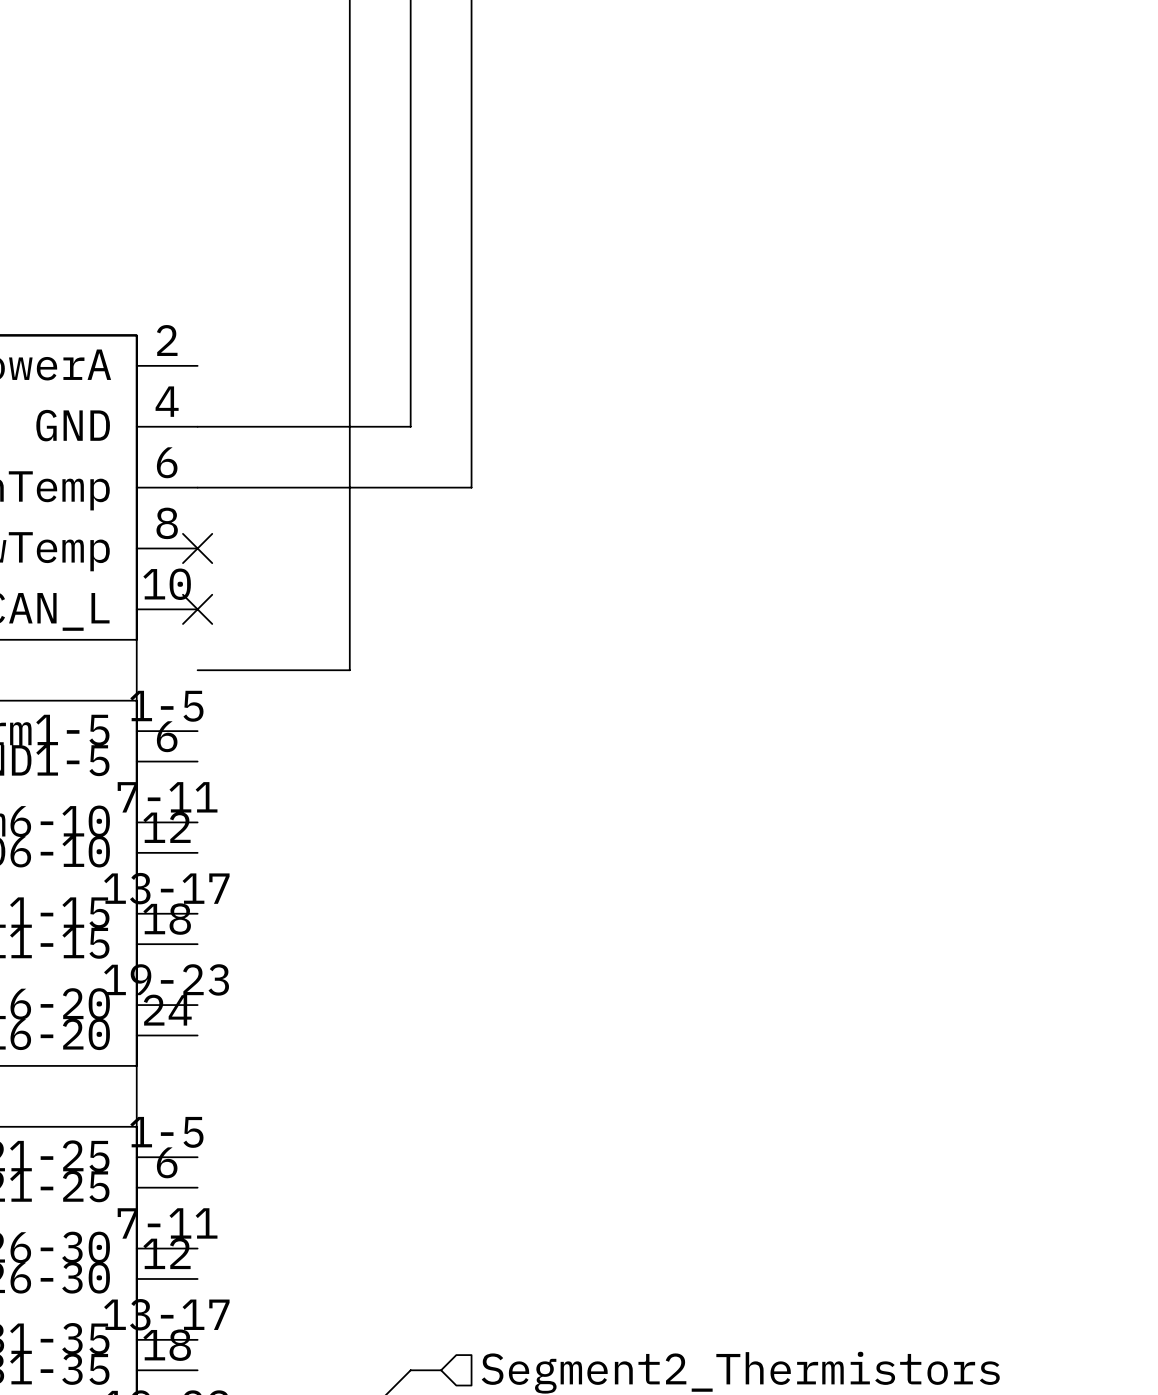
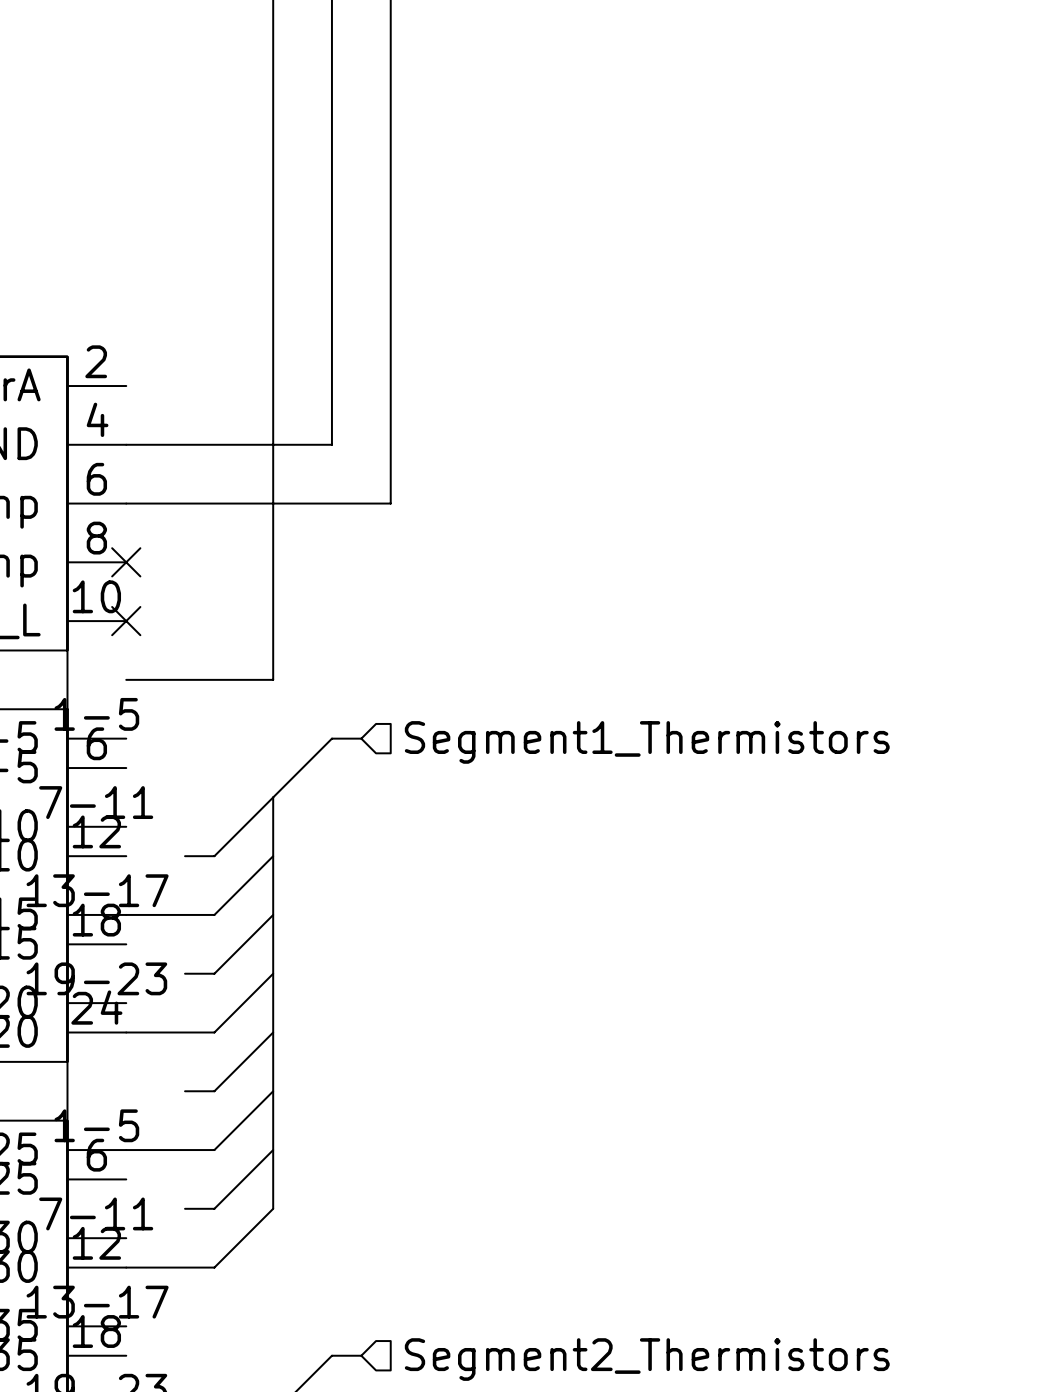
bus: none -> (361, 738) (331, 738) (273, 797) (273, 1208)
hierarchical label: none -> Segment1_Thermistors (647, 742)
wire: none -> (273, 797) (214, 856) (185, 856)
wire: none -> (273, 856) (214, 914) (126, 914)
wire: none -> (273, 914) (214, 973) (185, 973)
wire: none -> (273, 973) (214, 1032) (126, 1032)
wire: none -> (273, 1032) (214, 1091) (185, 1091)
wire: none -> (273, 1091) (214, 1150) (126, 1150)
wire: none -> (273, 1150) (214, 1208) (185, 1208)
wire: none -> (273, 1208) (214, 1267) (126, 1267)

